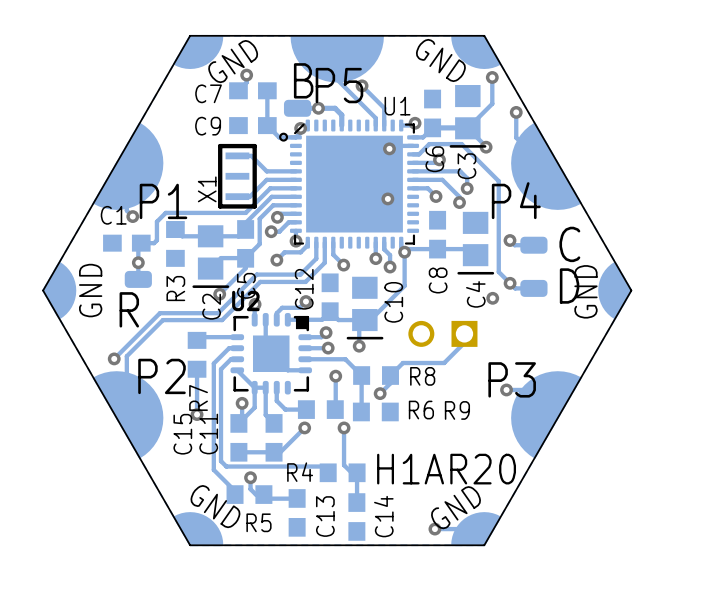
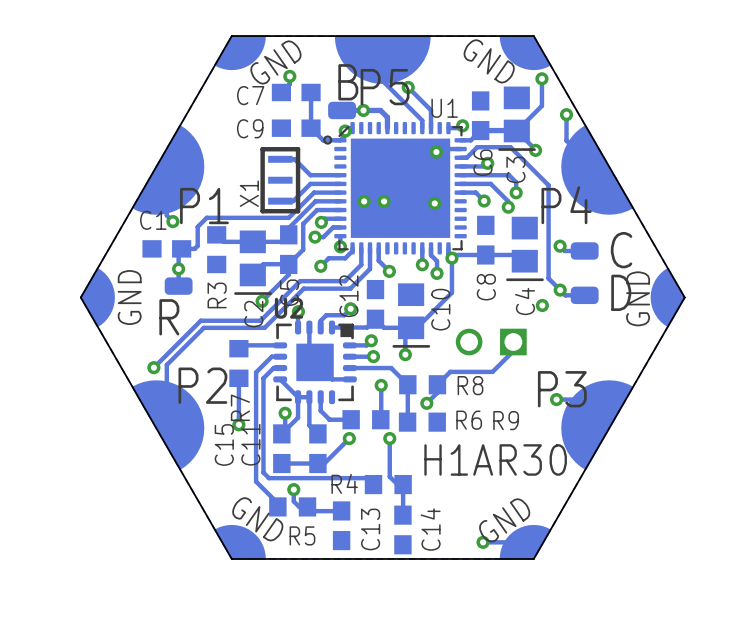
via: none -> (364, 201)
via: none -> (384, 201)
text: H1AR20 (446, 469) -> H1AR30 (495, 459)

